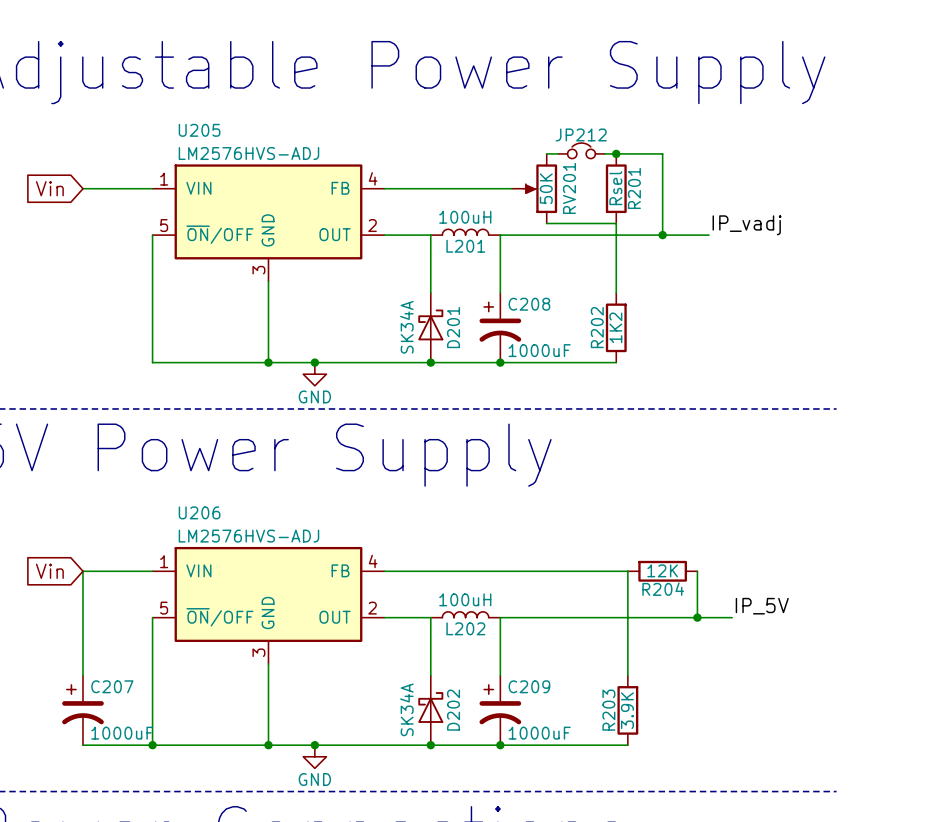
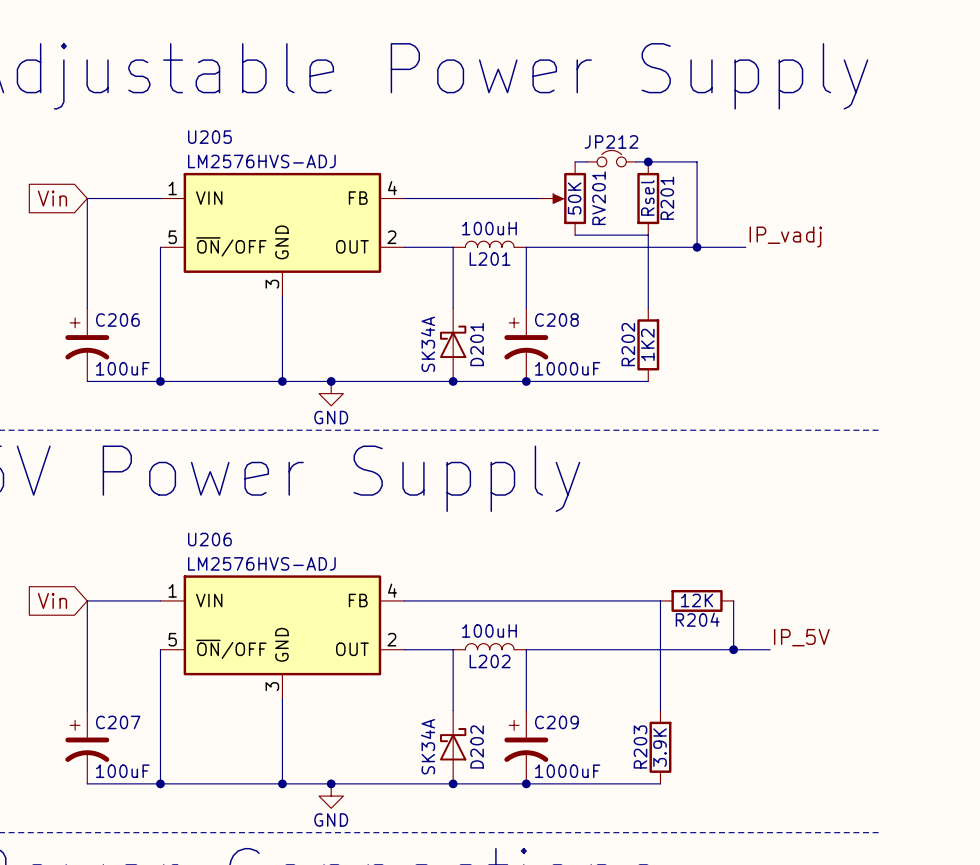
wire: none -> (87, 198) (87, 308)
C206: none -> 100uF (87, 344)
wire: none -> (87, 381) (160, 381)
junction: none -> (160, 381)
C207 value: 1000uF (122, 733) -> 100uF (122, 771)

